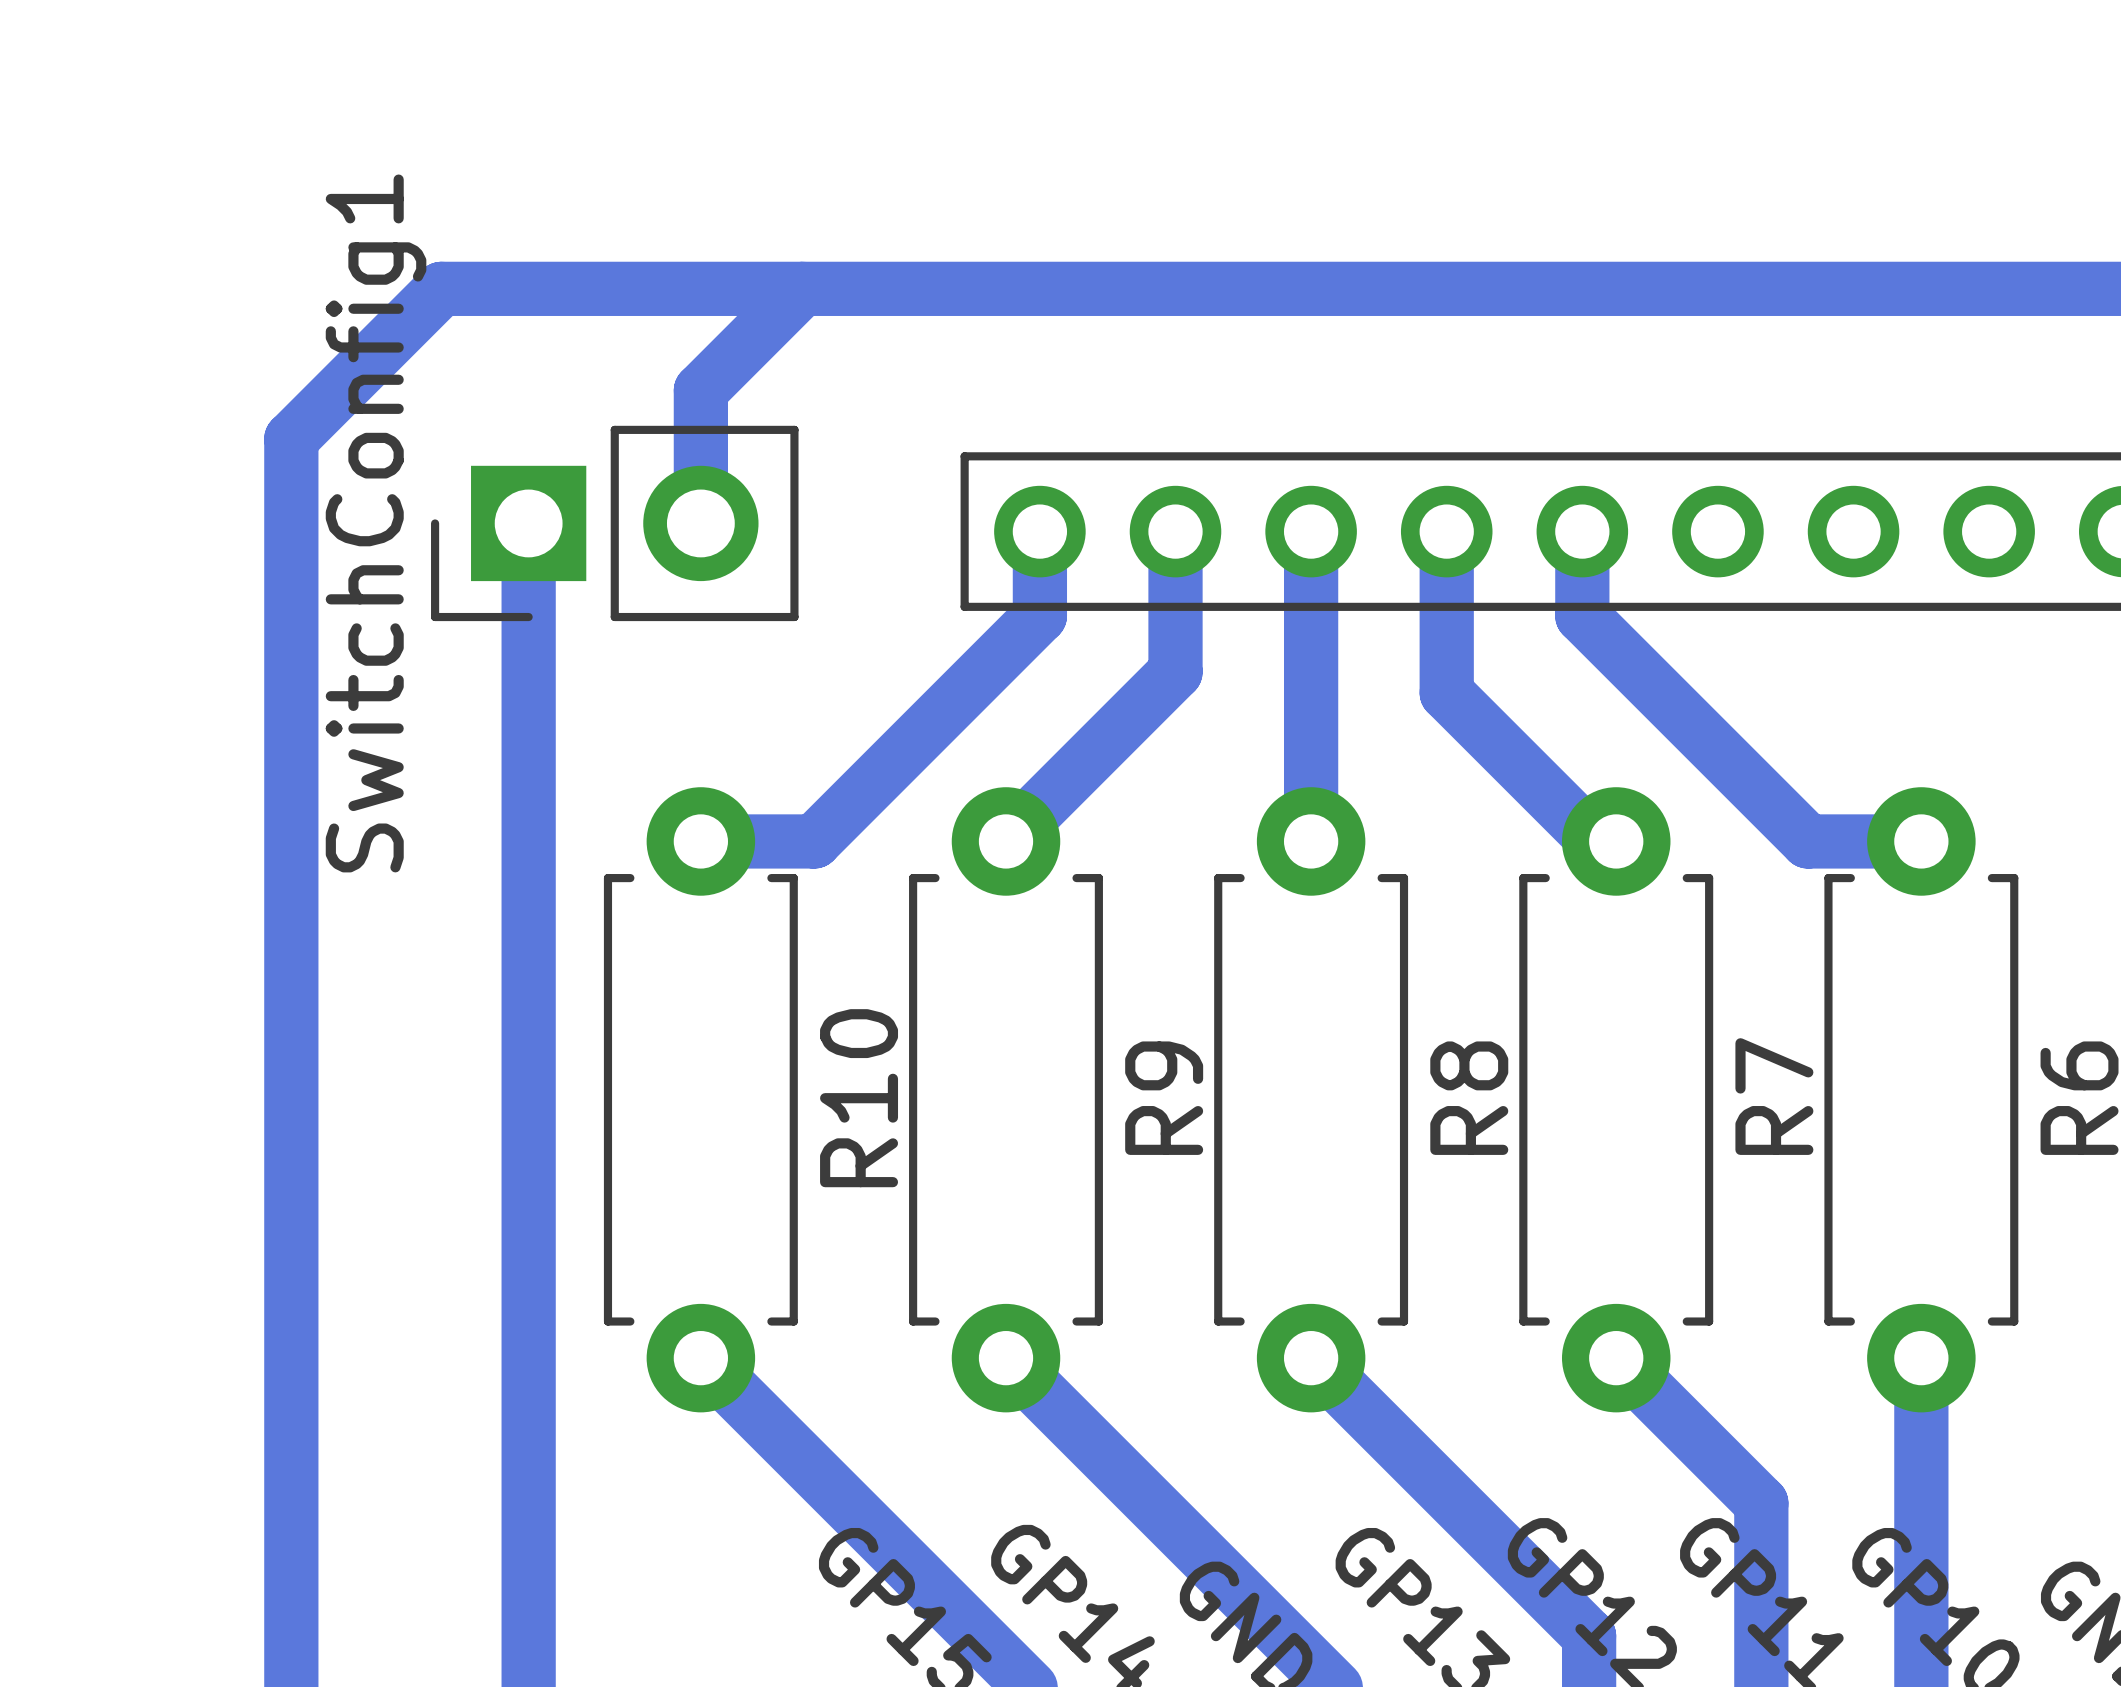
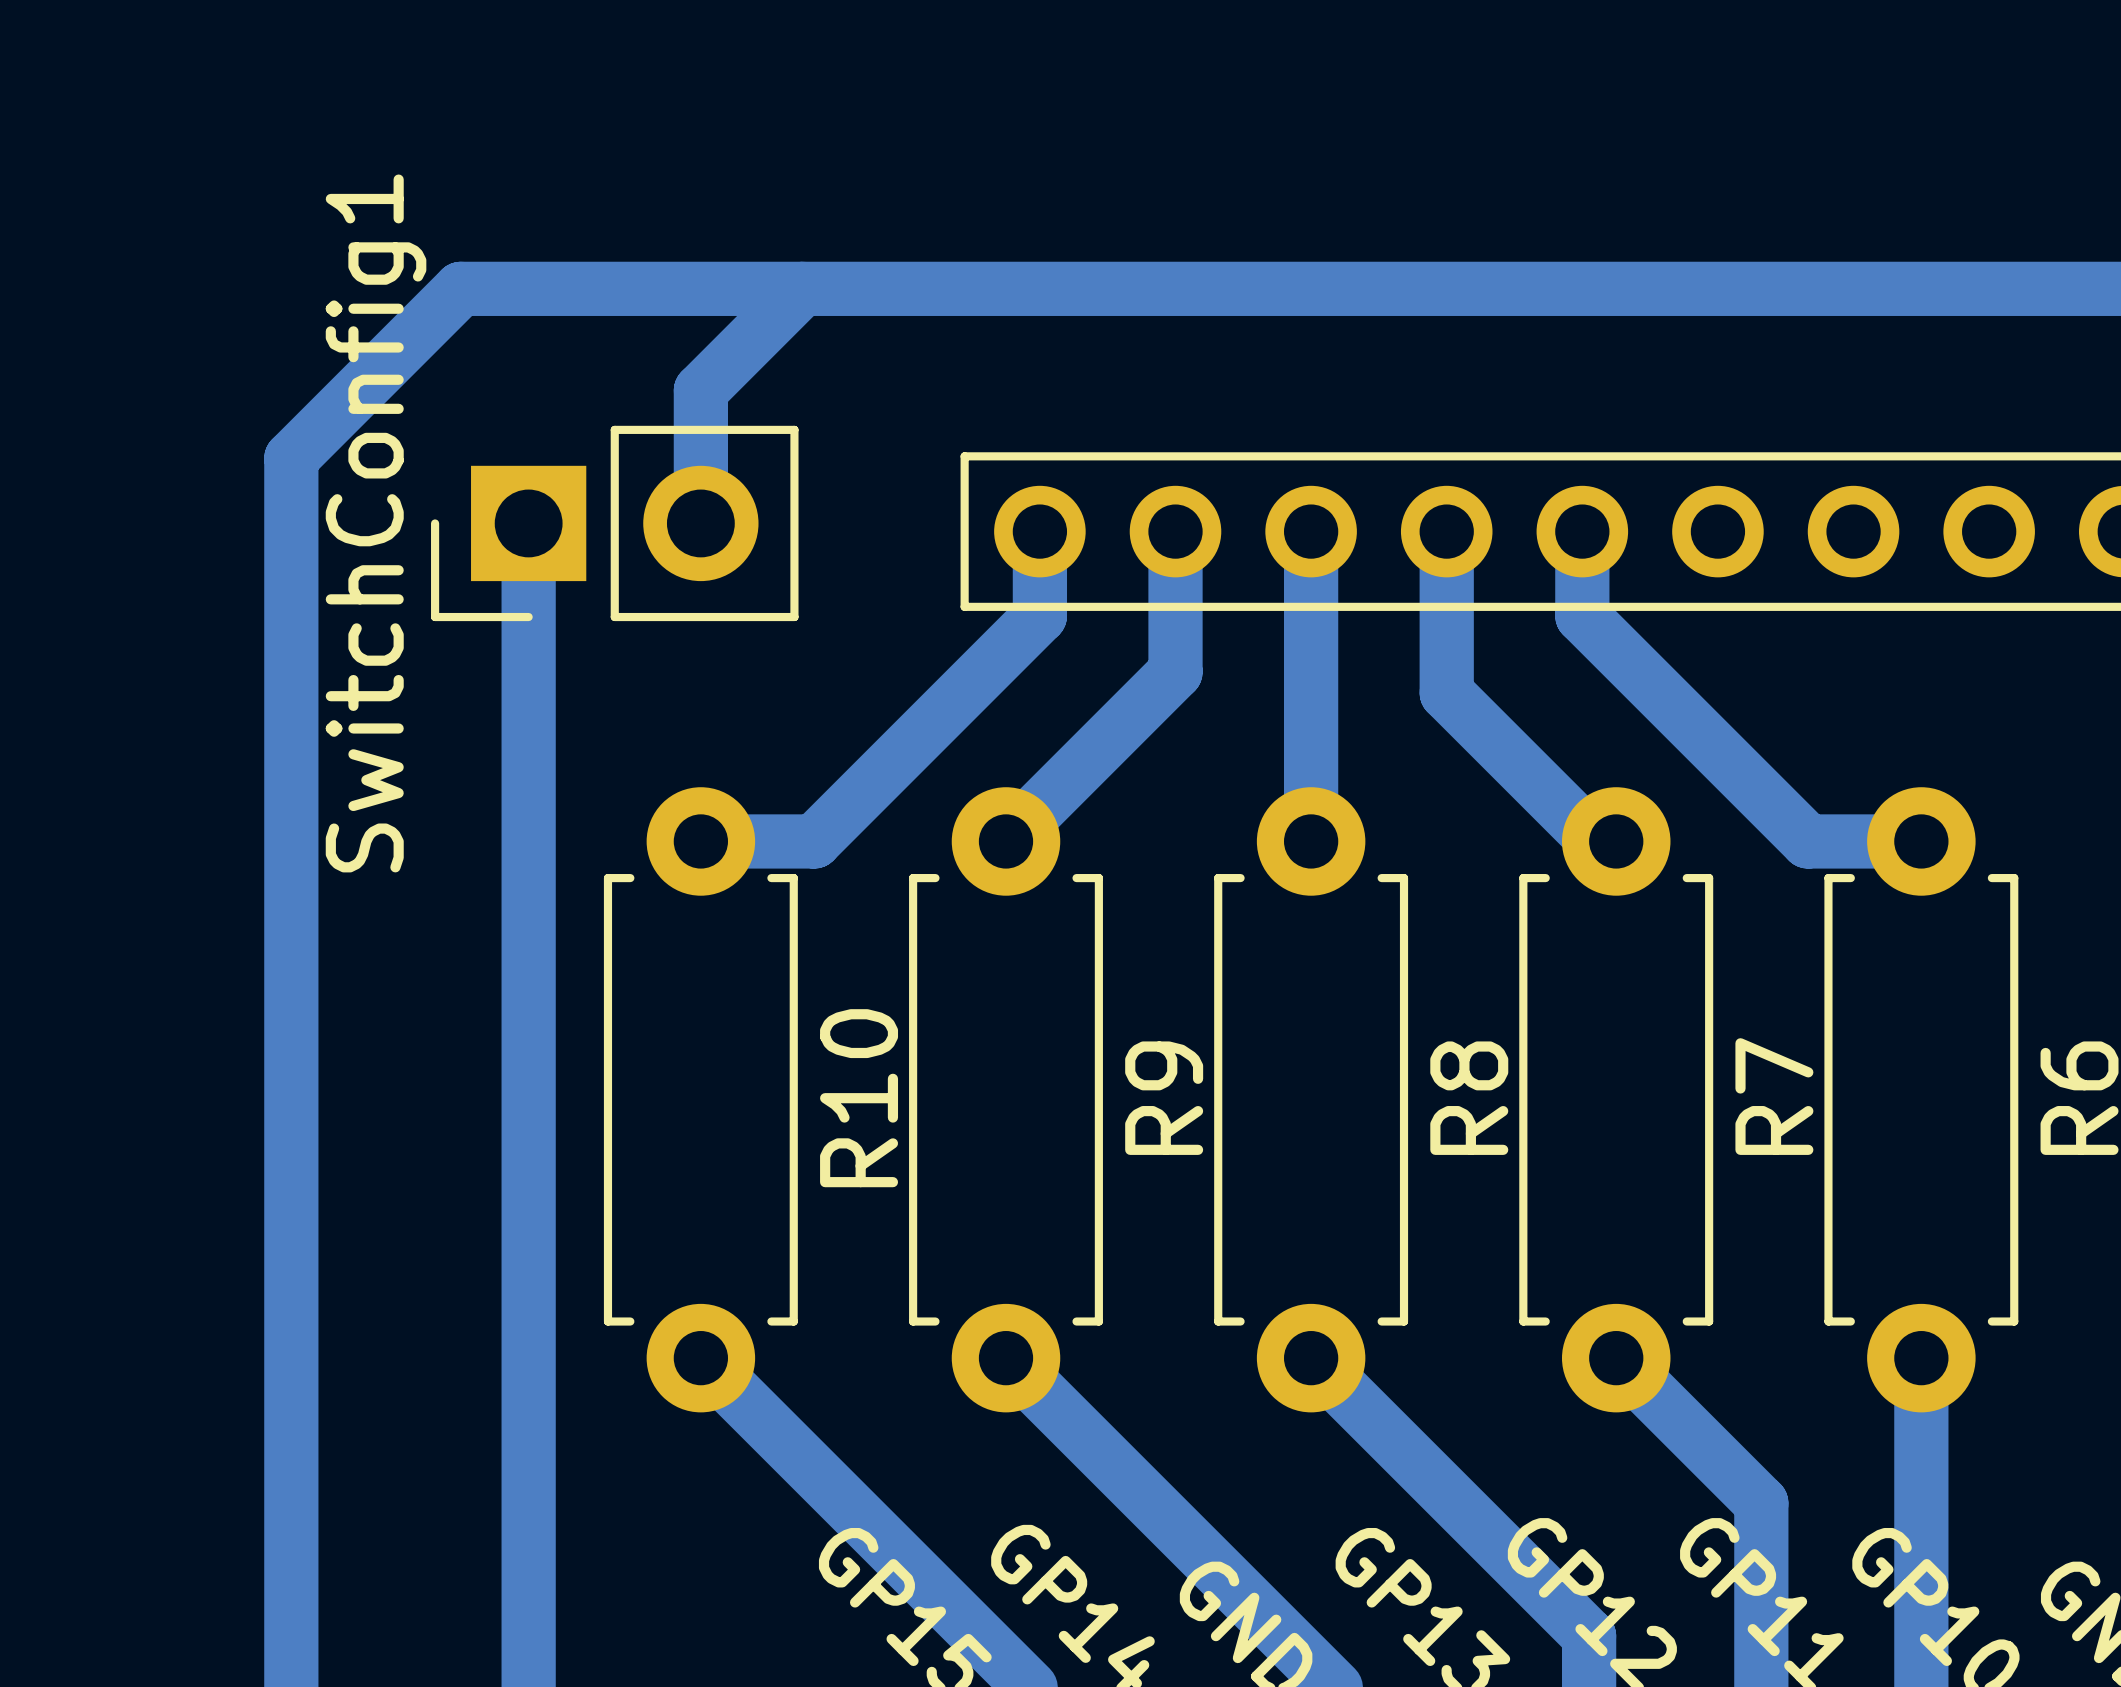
bottom track: (460, 288) (441, 288) (291, 438) (291, 458) -> (460, 288) (291, 458)

